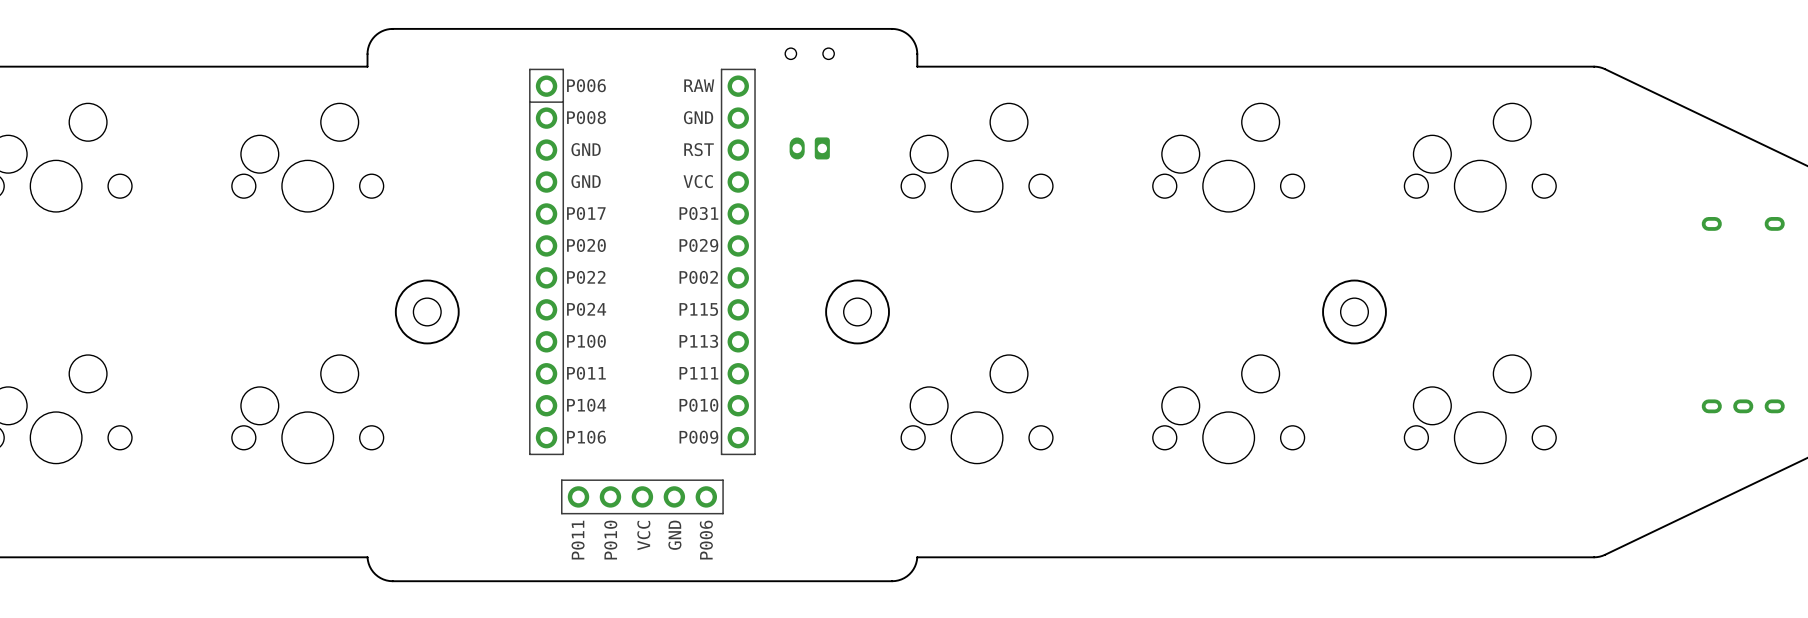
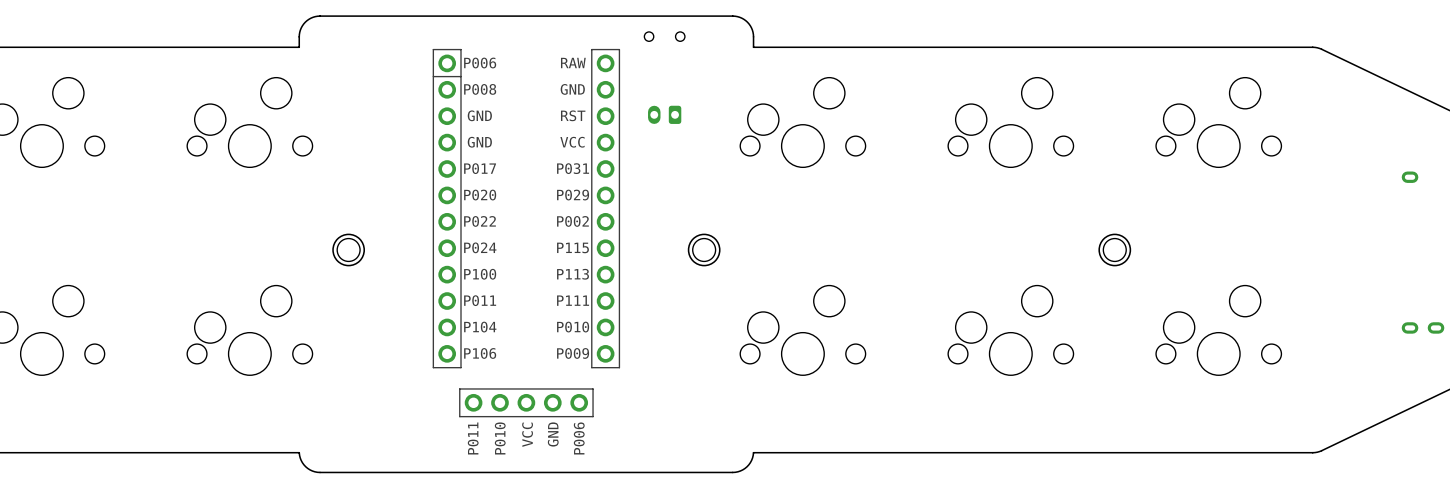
round board edge size: [394, 279, 460, 345] -> [332, 233, 366, 267]
round board edge size: [825, 279, 890, 345] -> [687, 233, 721, 267]
round board edge size: [1322, 279, 1387, 345] -> [1098, 233, 1132, 267]

